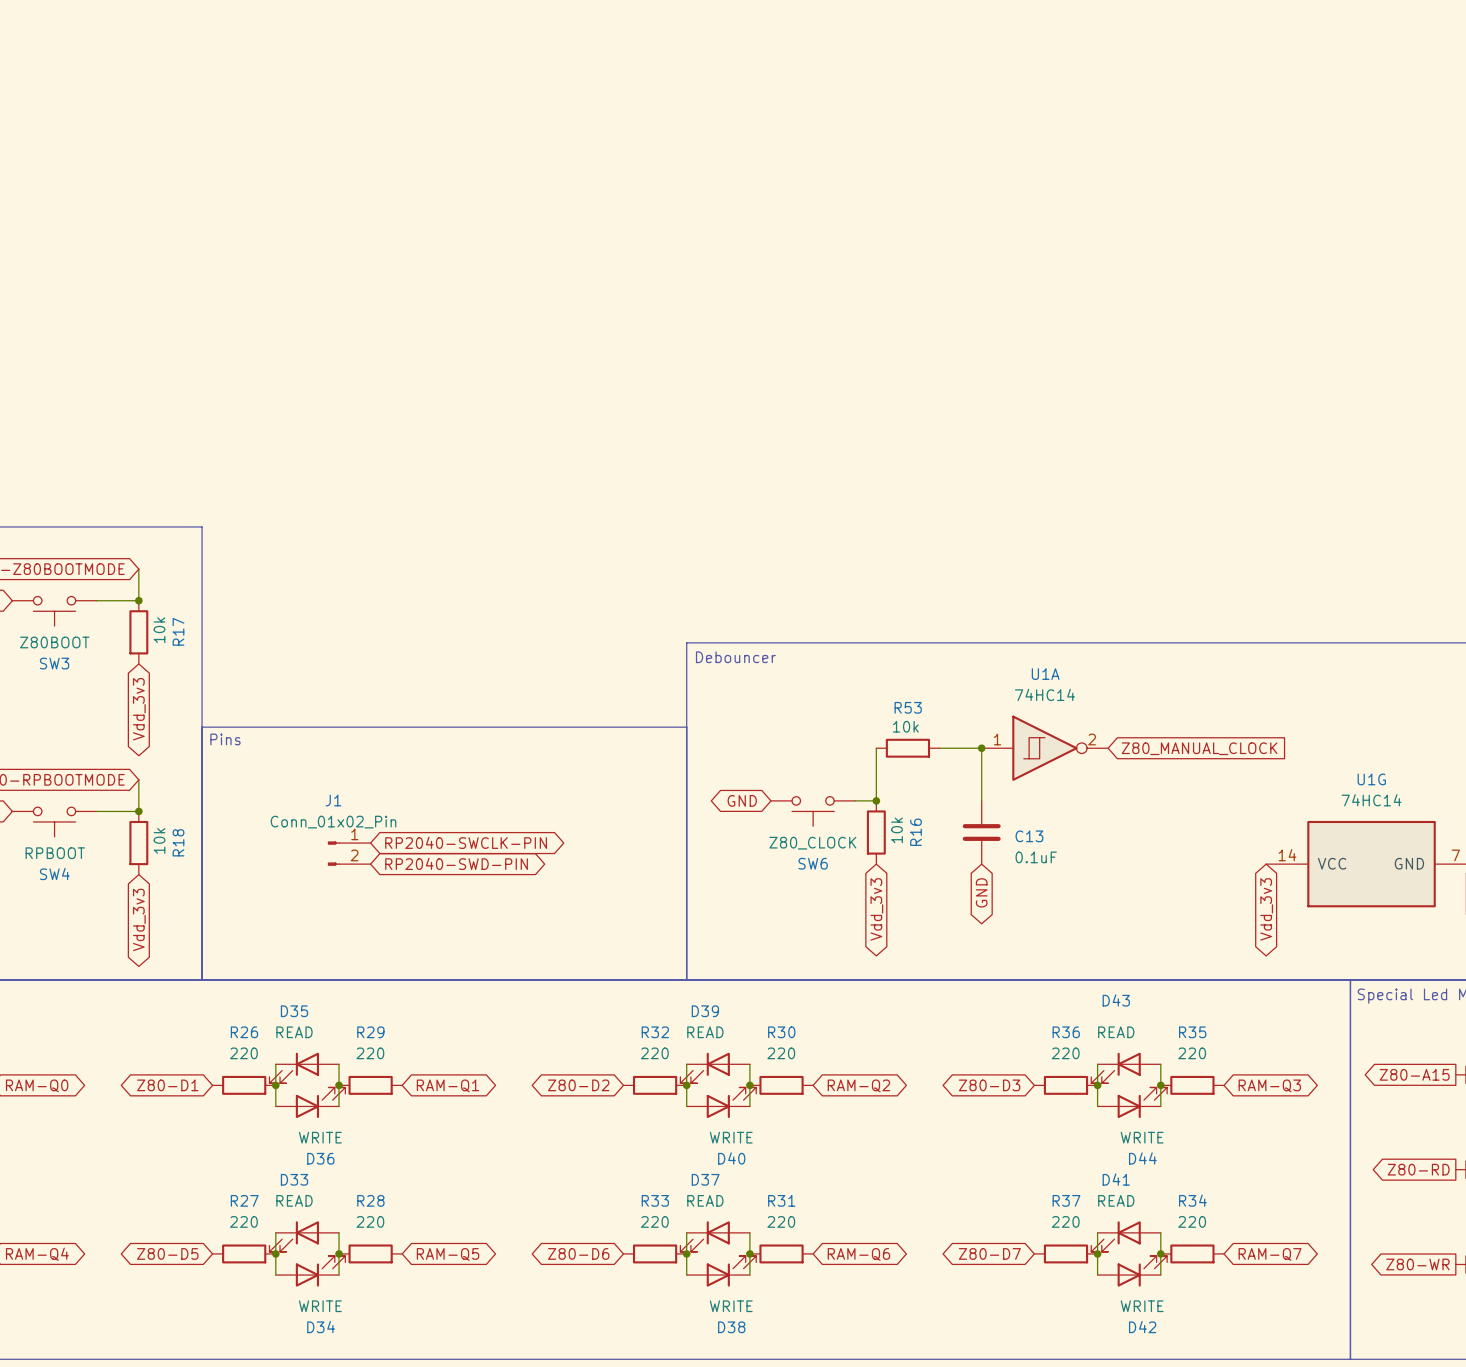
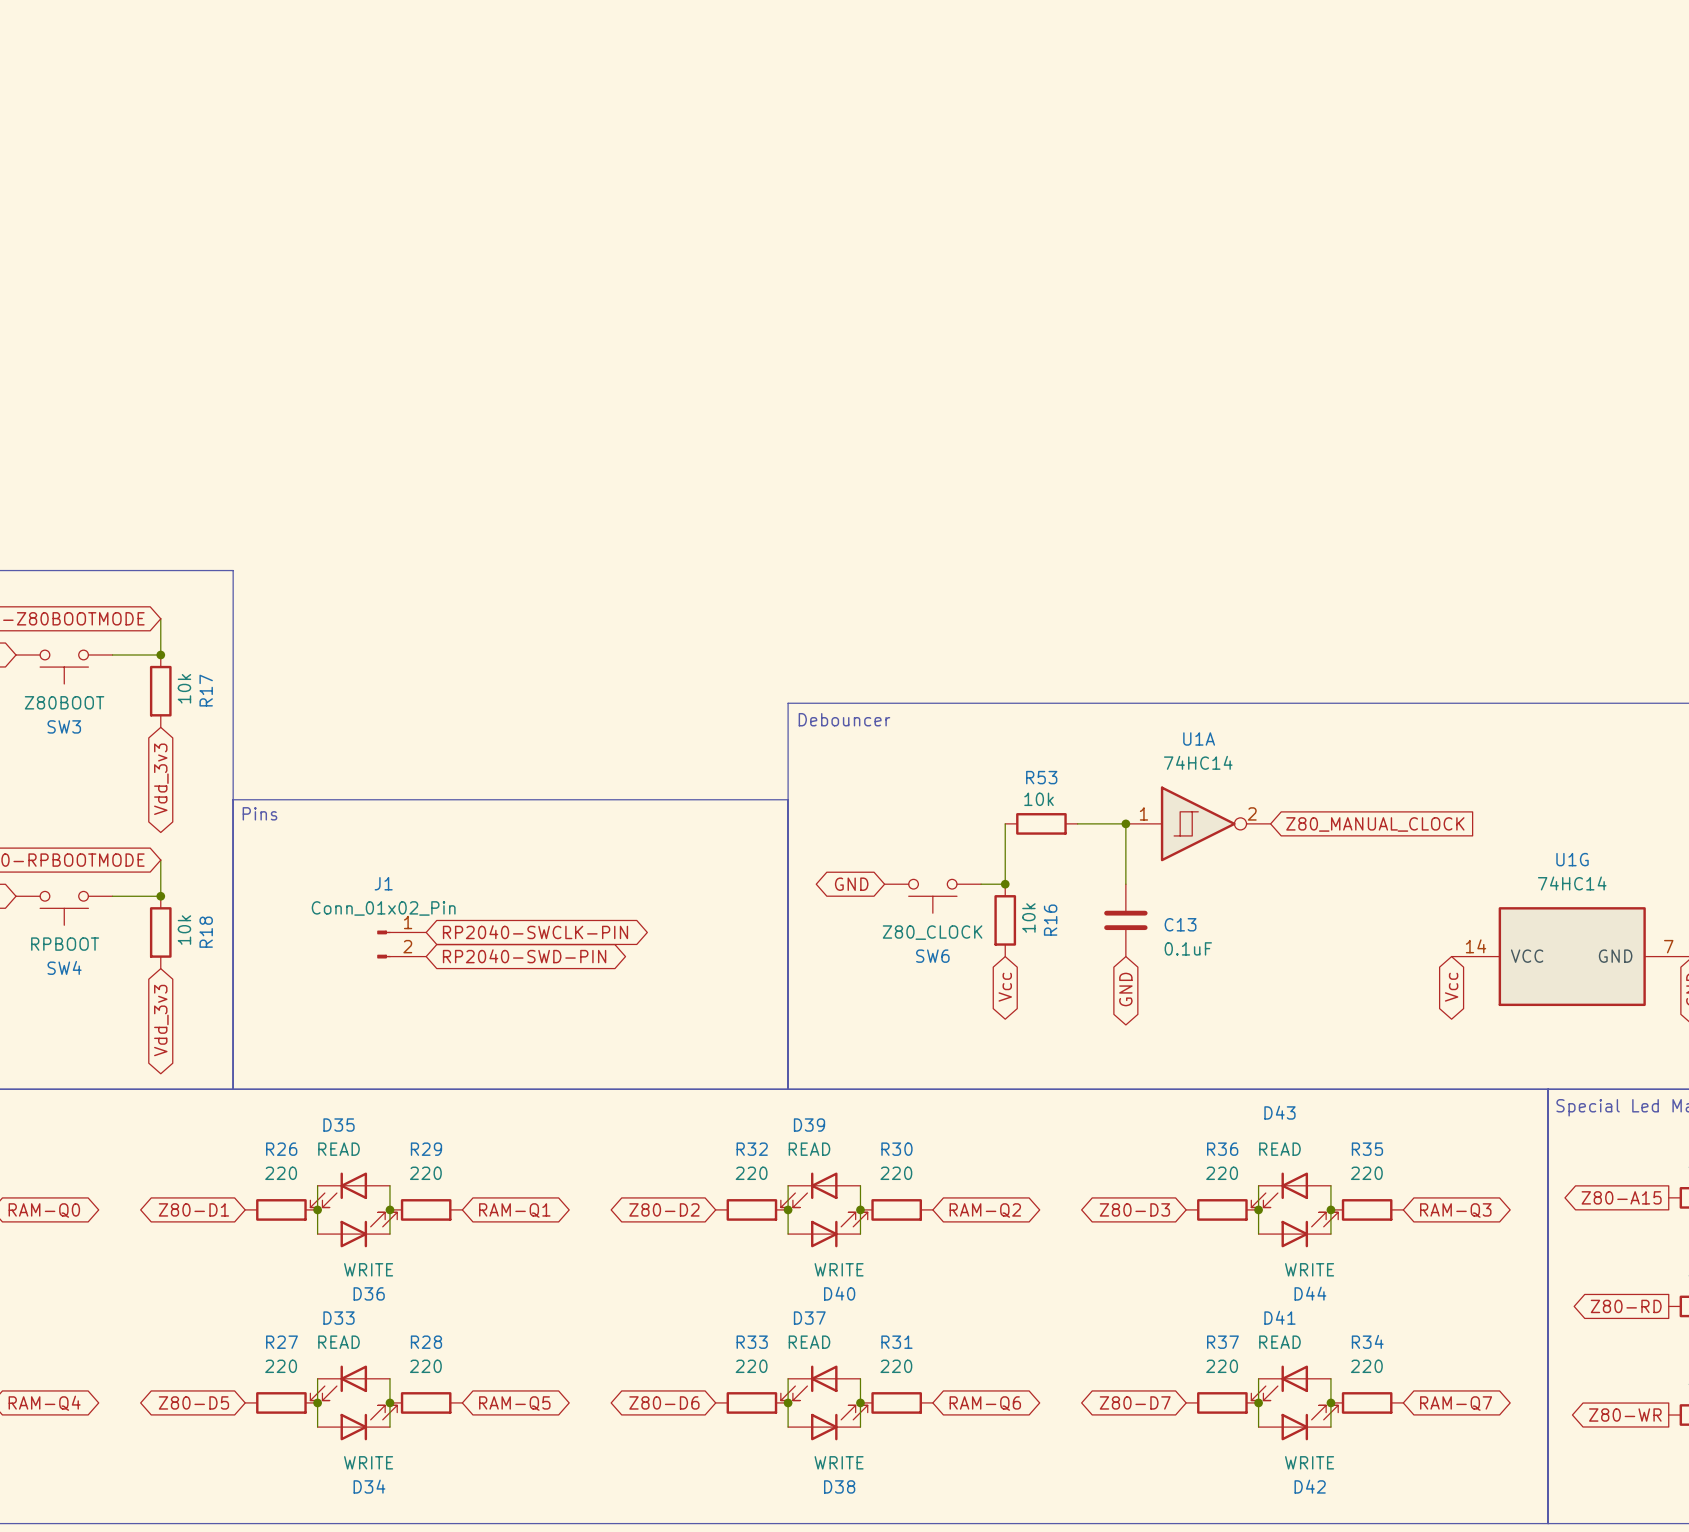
global label: Vdd_3v3 (876, 909) -> Vcc (1005, 987)
global label: Vdd_3v3 (1266, 909) -> Vcc (1451, 987)

